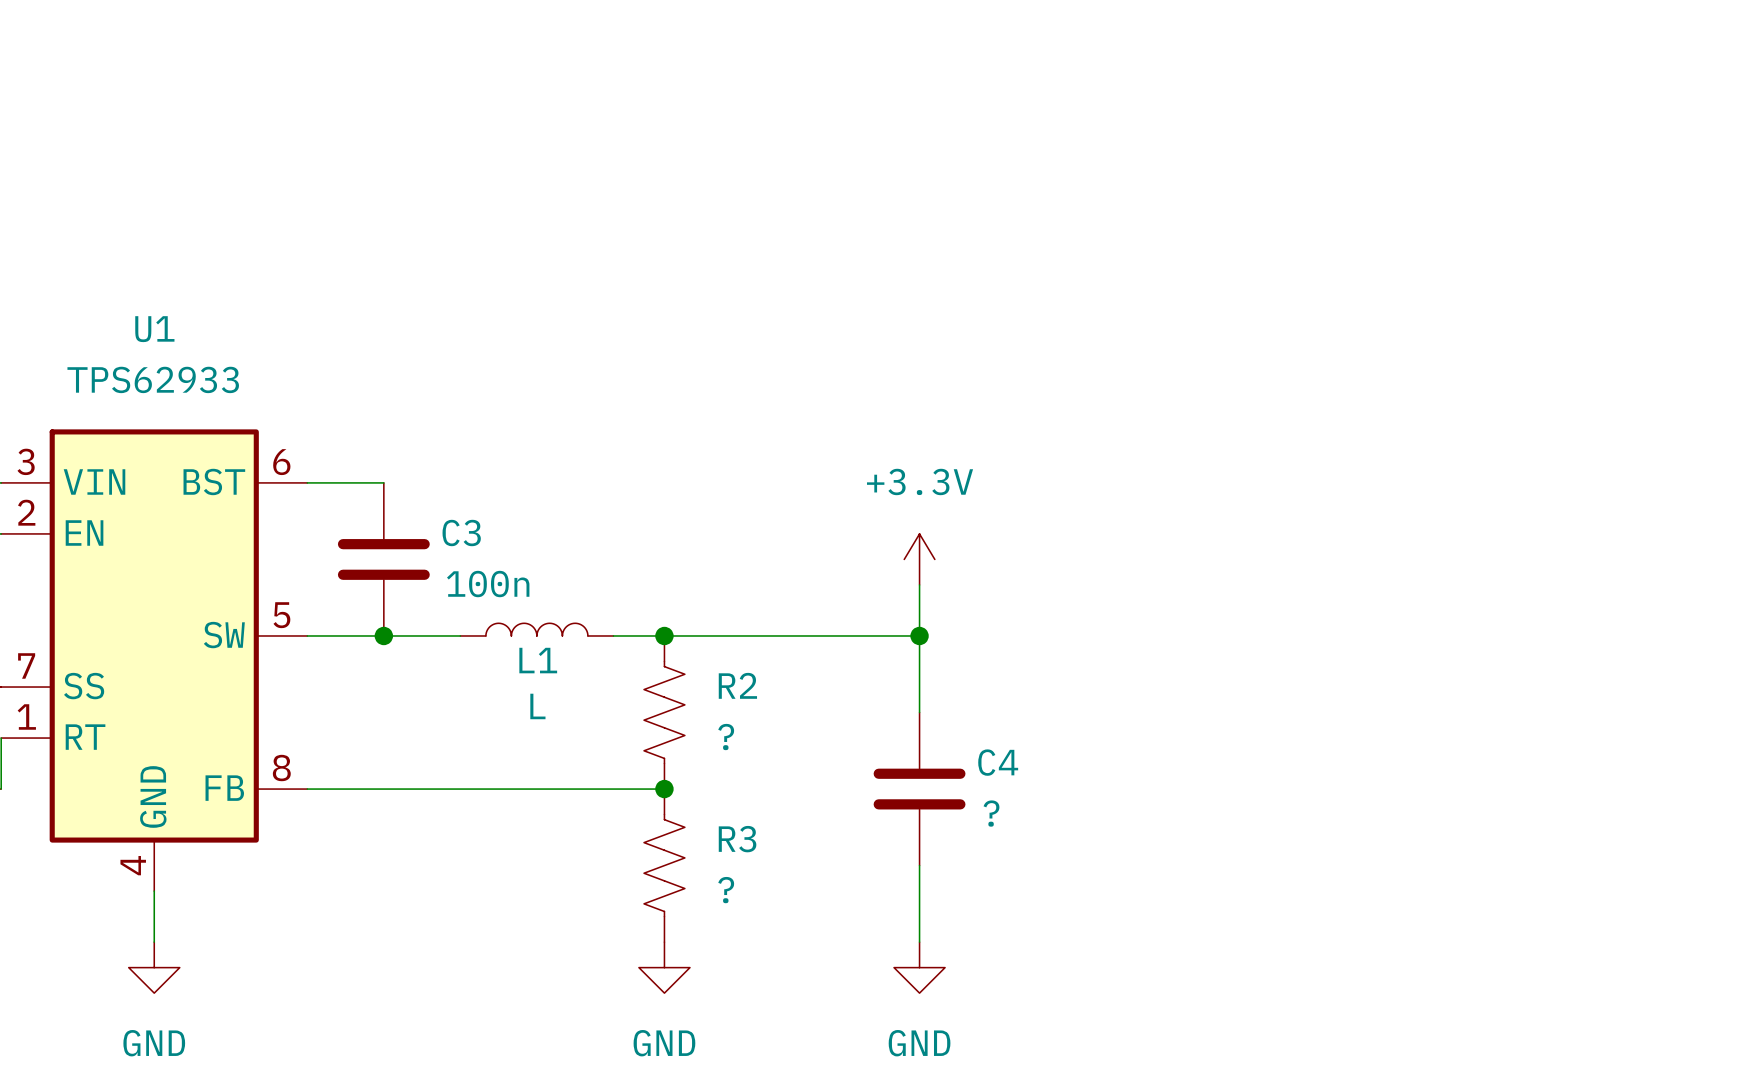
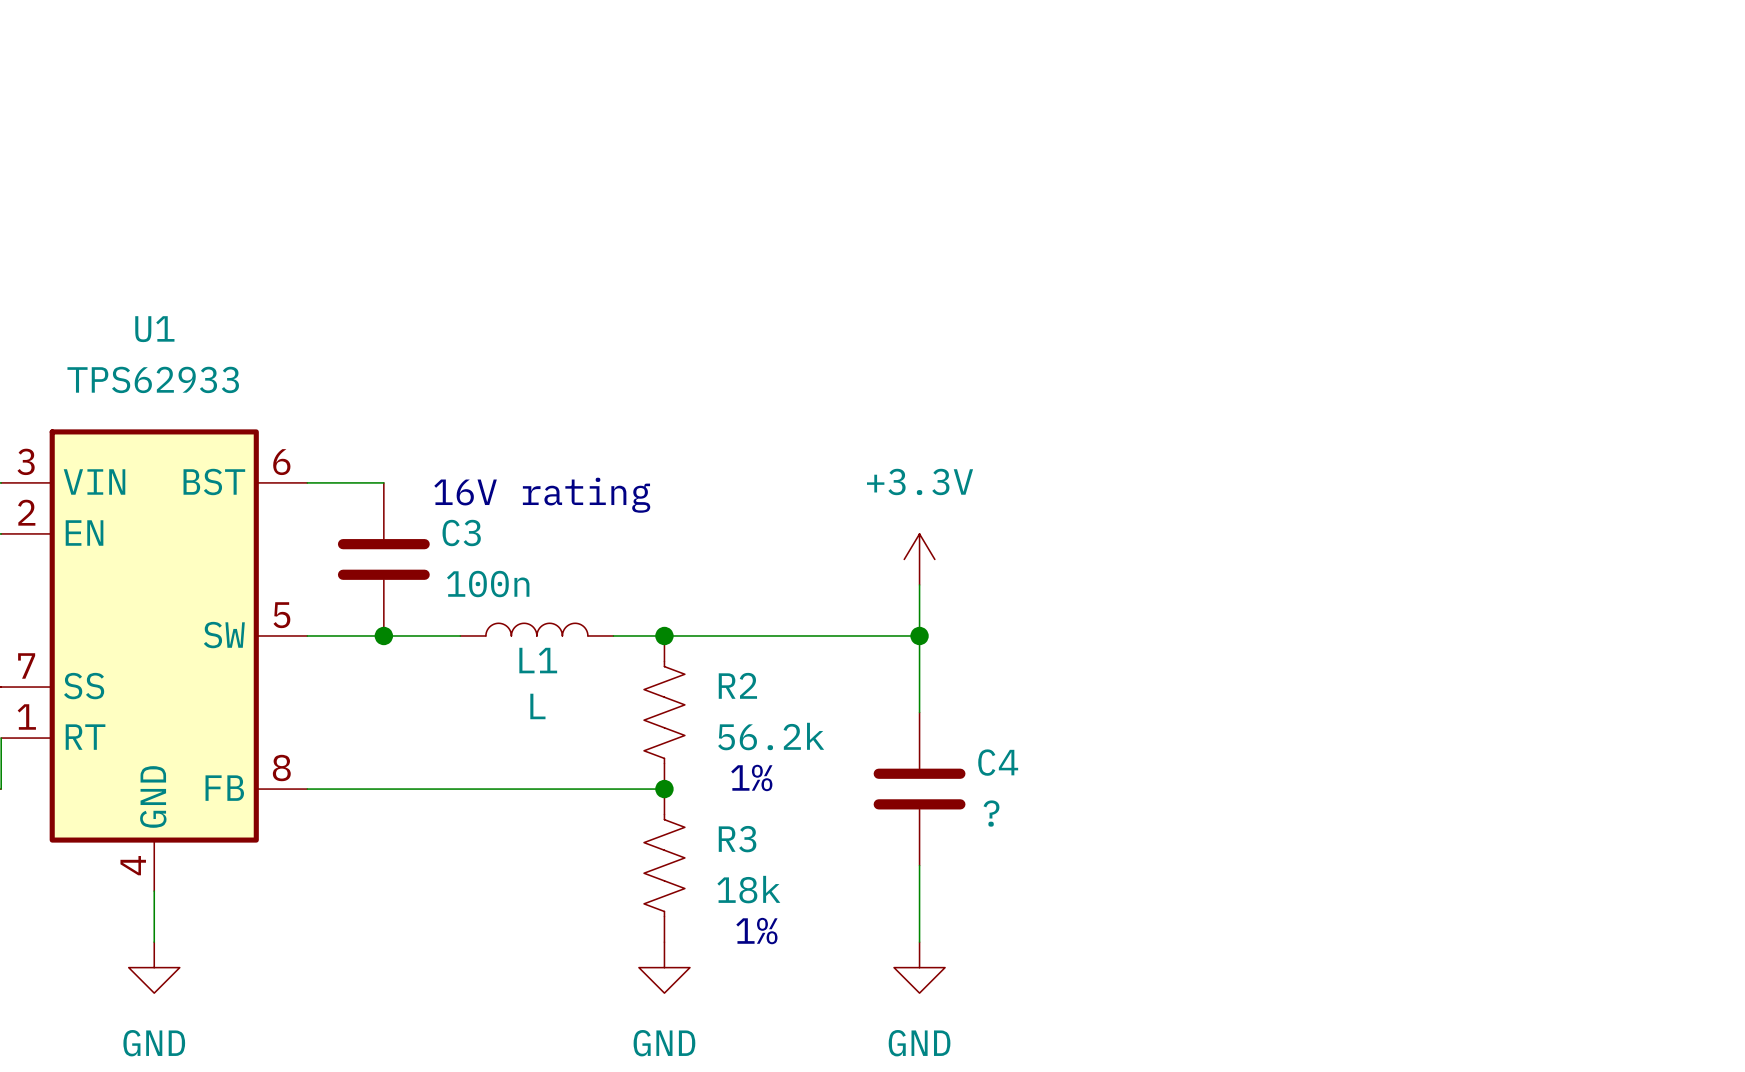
text: none -> 16V rating (542, 495)
R2 value: ? (726, 737) -> 56.2k (771, 736)
text: none -> 1% (751, 777)
R3 value: ? (726, 890) -> 18k (748, 889)
text: none -> 1% (756, 931)

